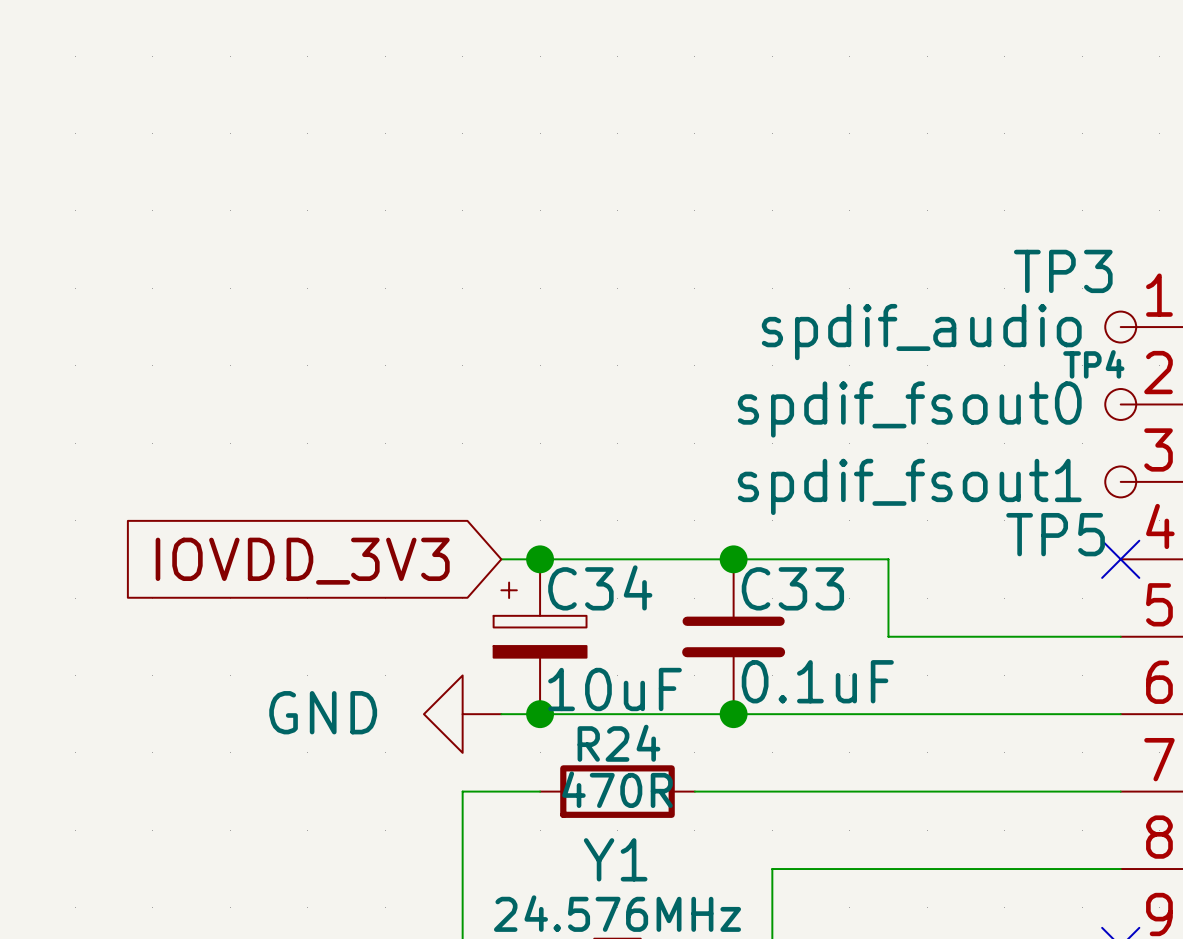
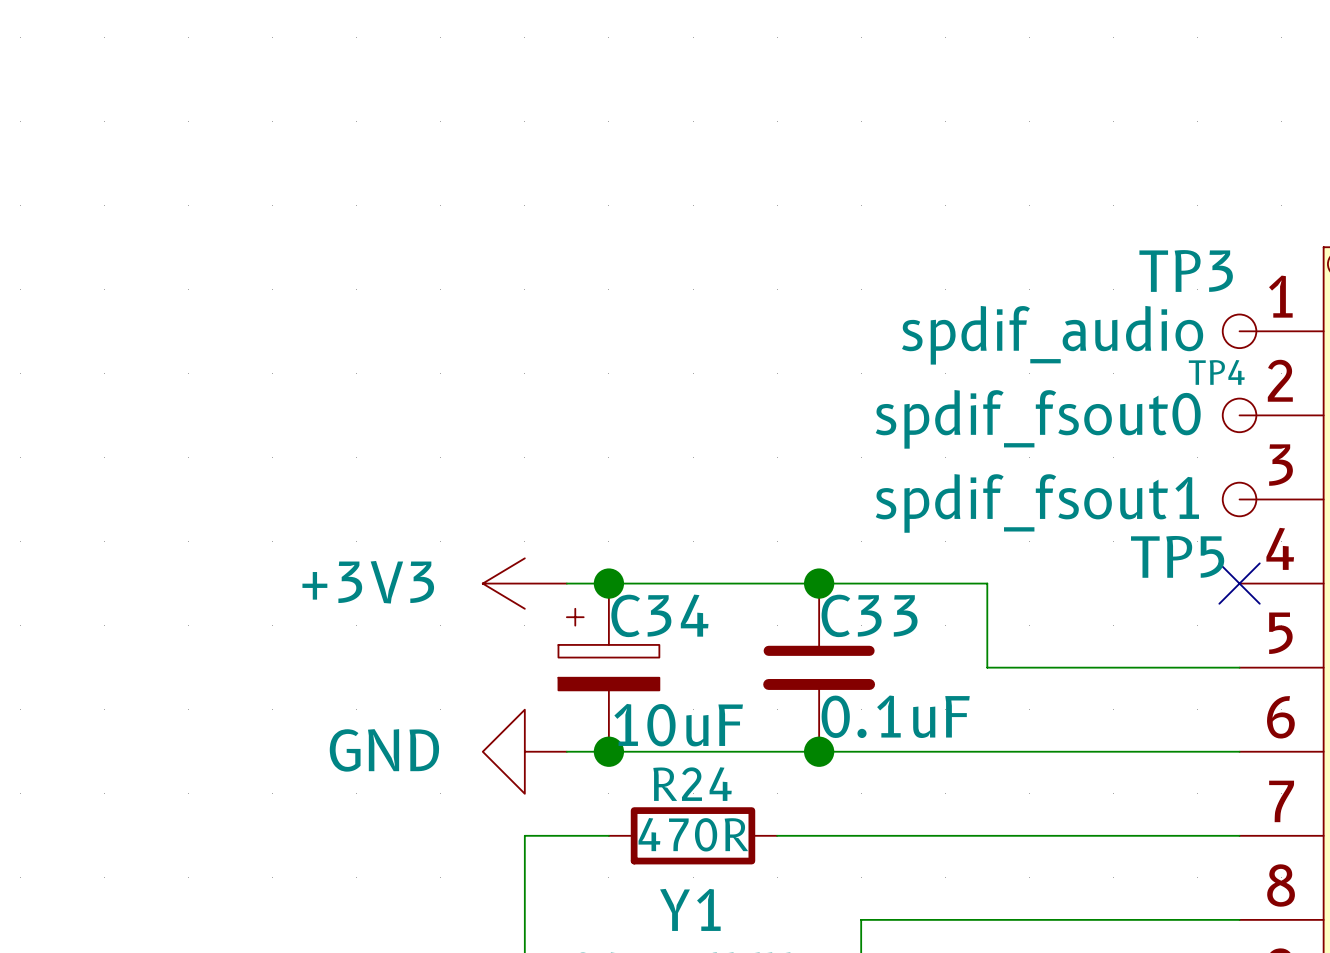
power symbol: none -> +3V3 (524, 583)
global label: IOVDD_3V3 (302, 561) -> none

